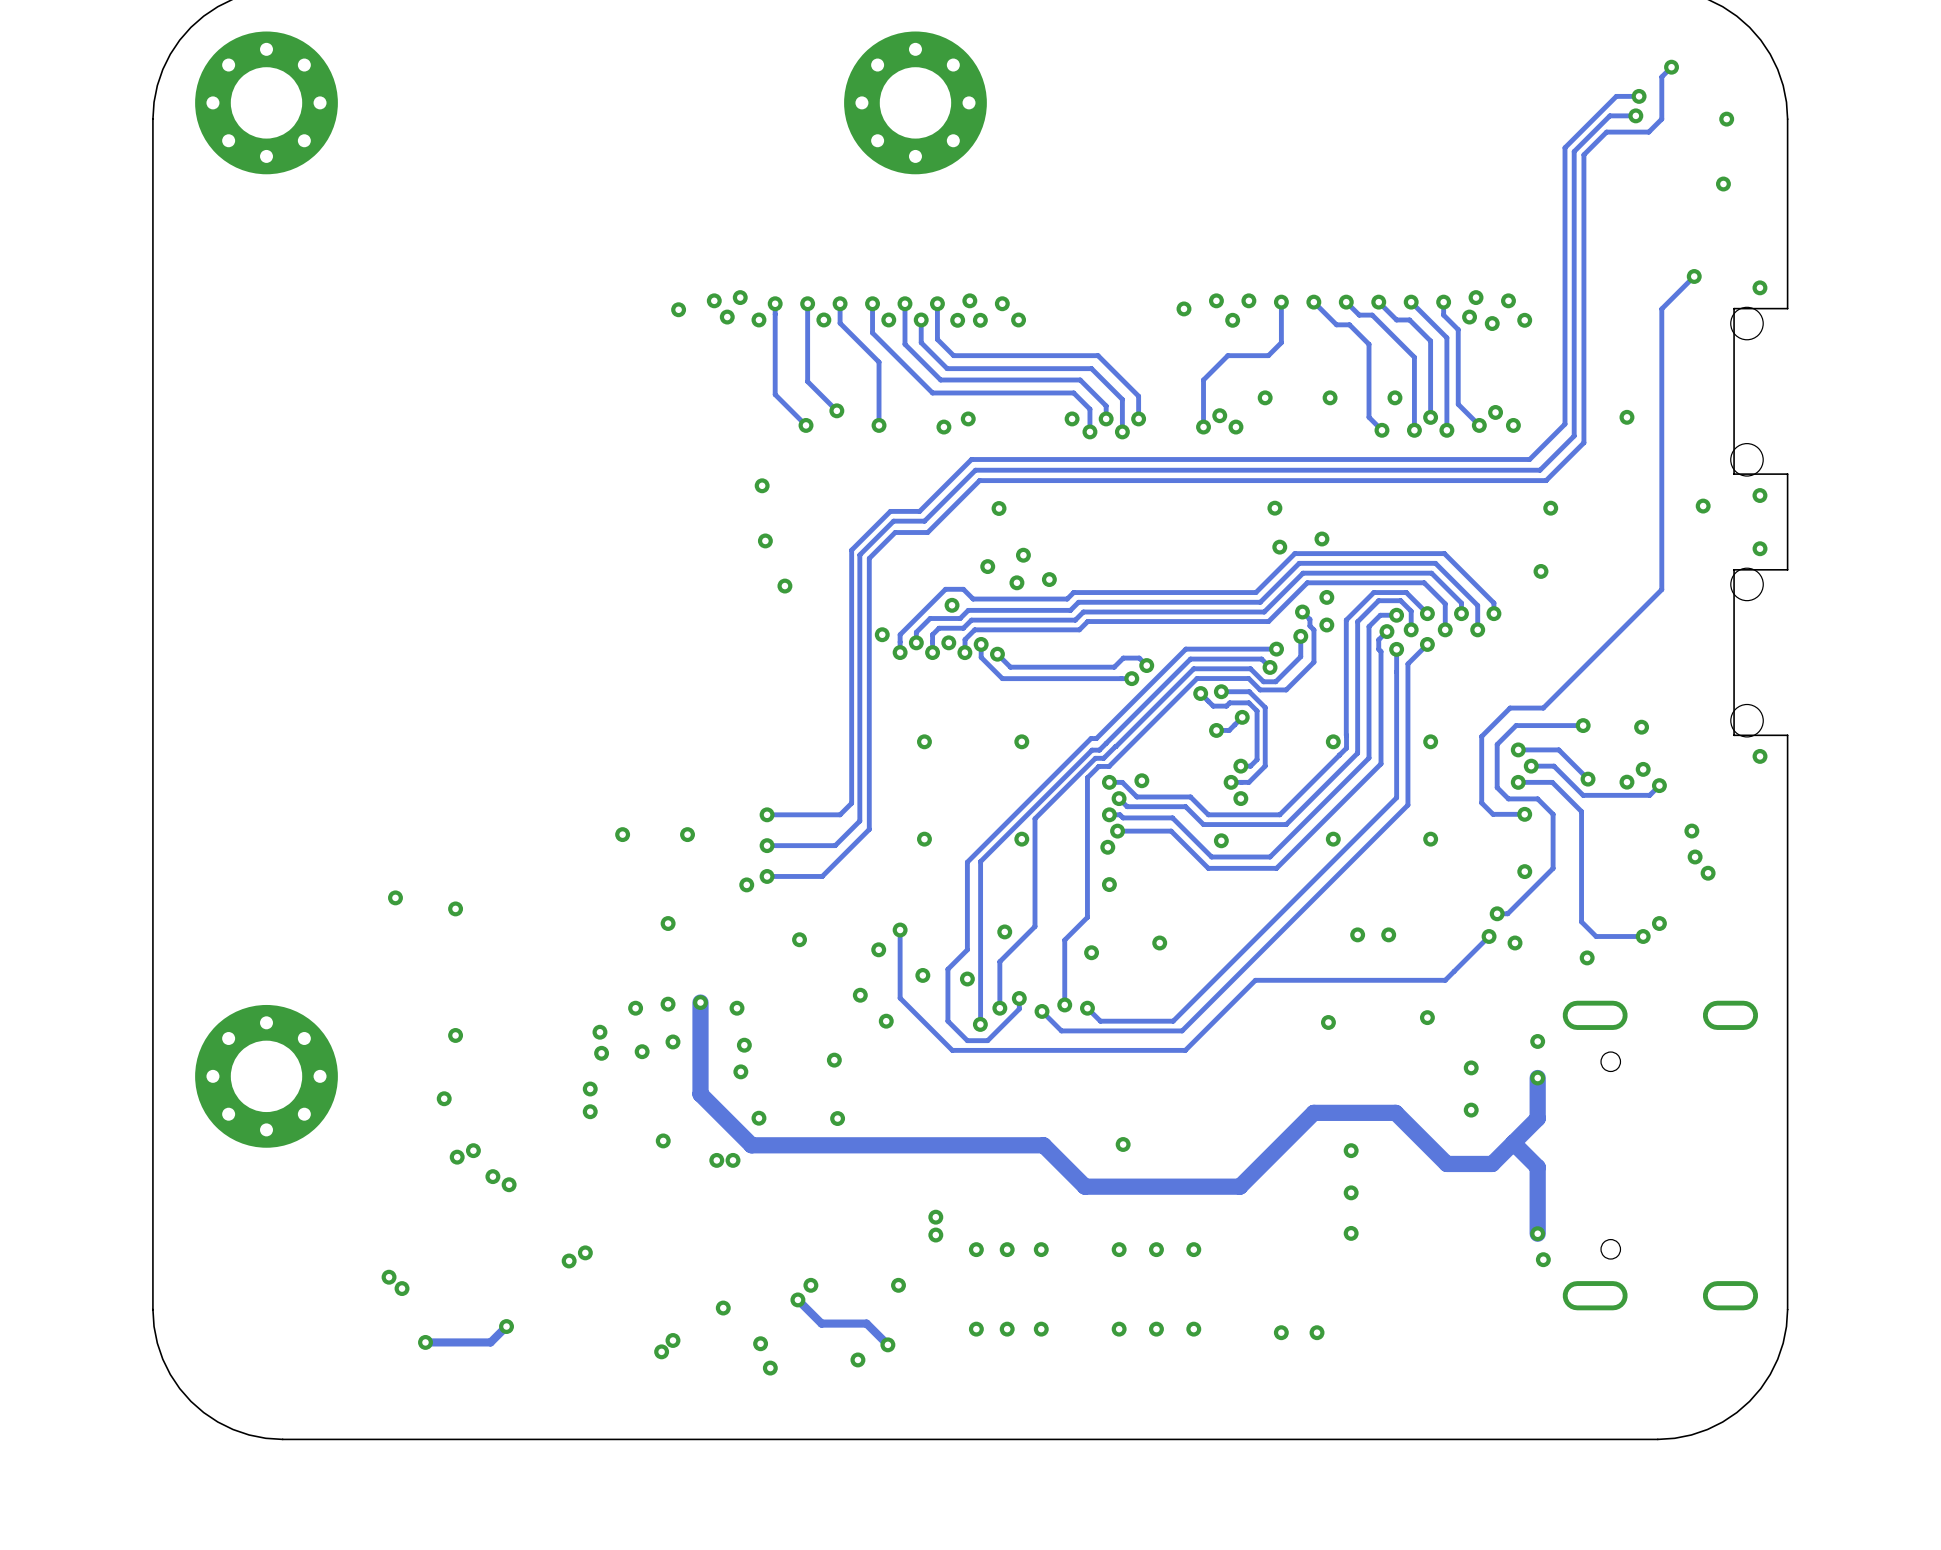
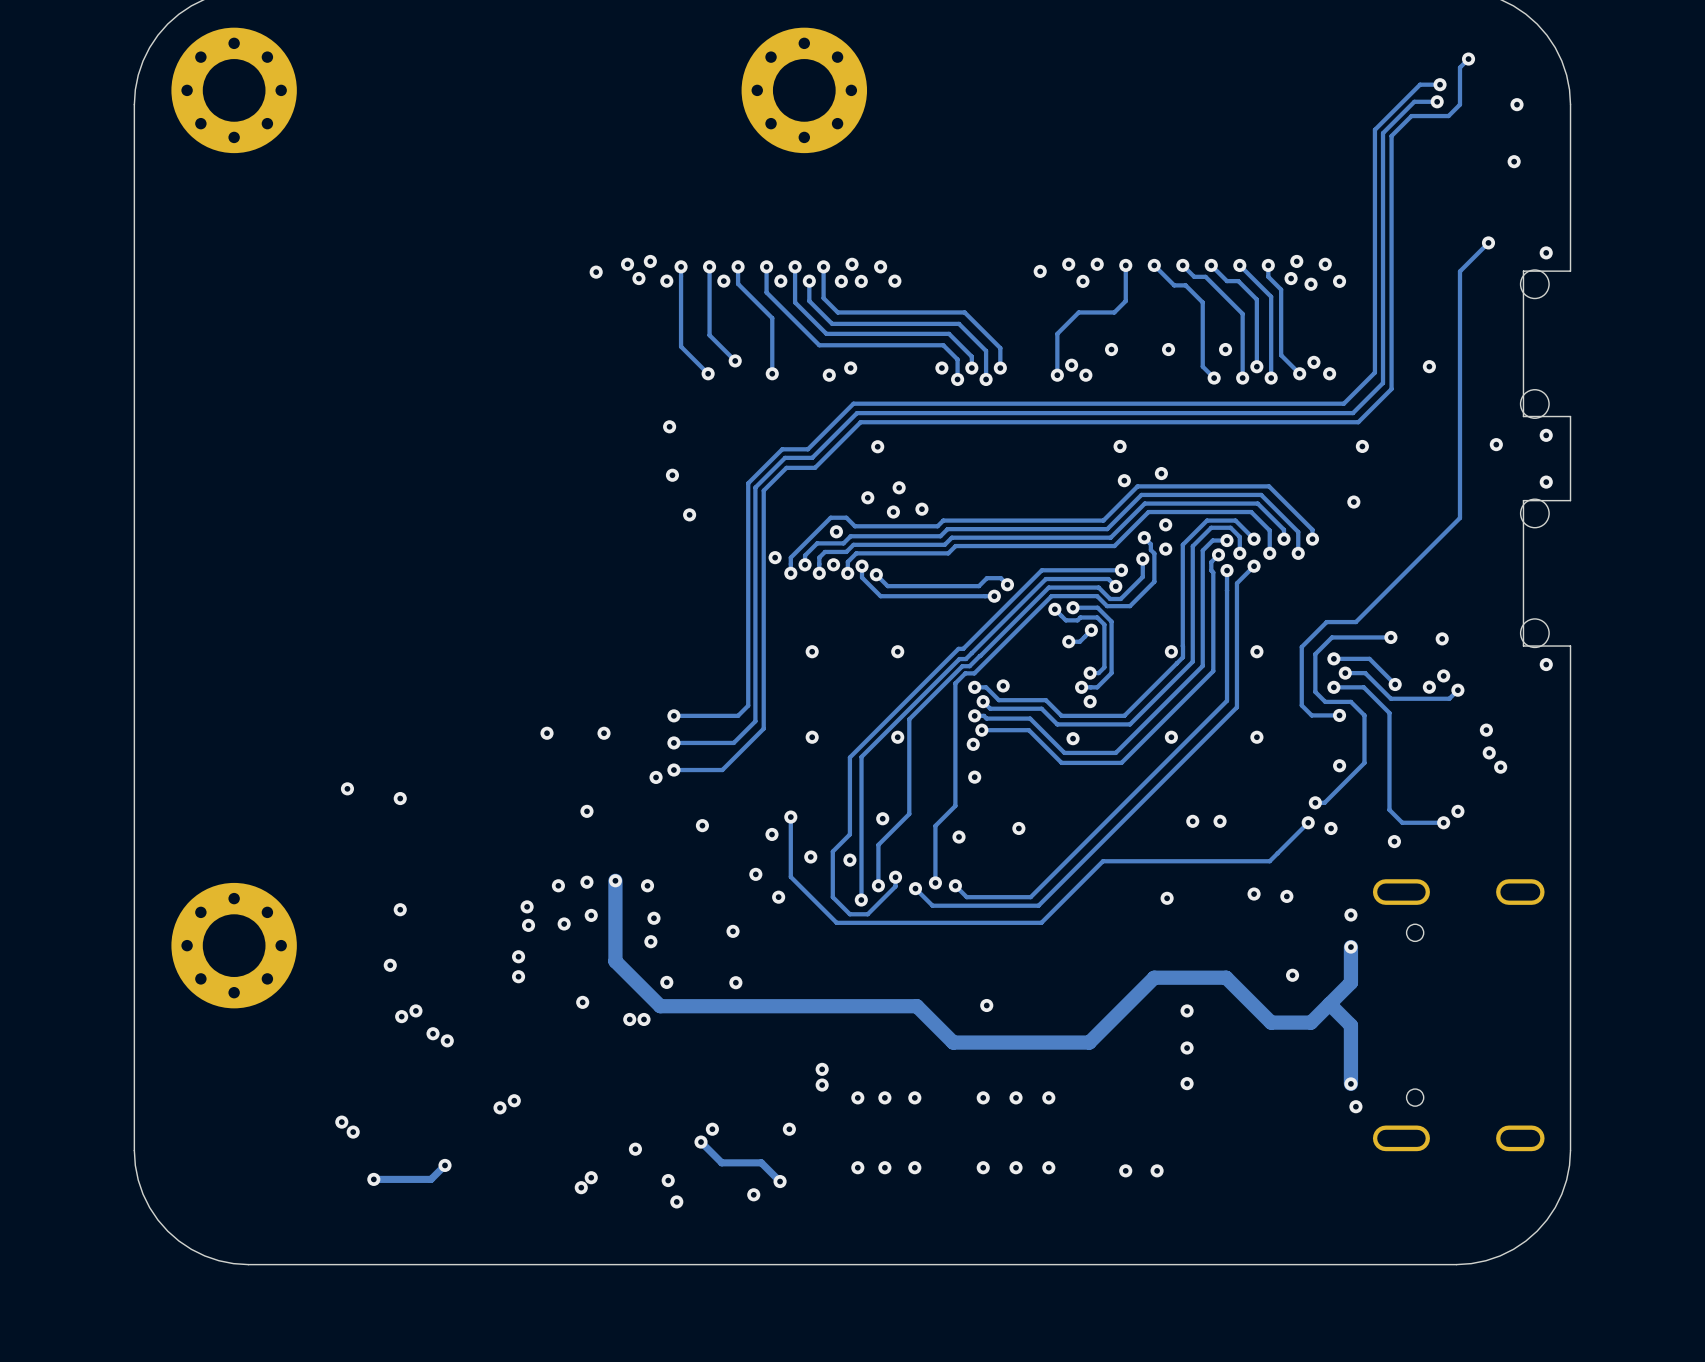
via position: (1471, 1067) -> (1286, 896)

